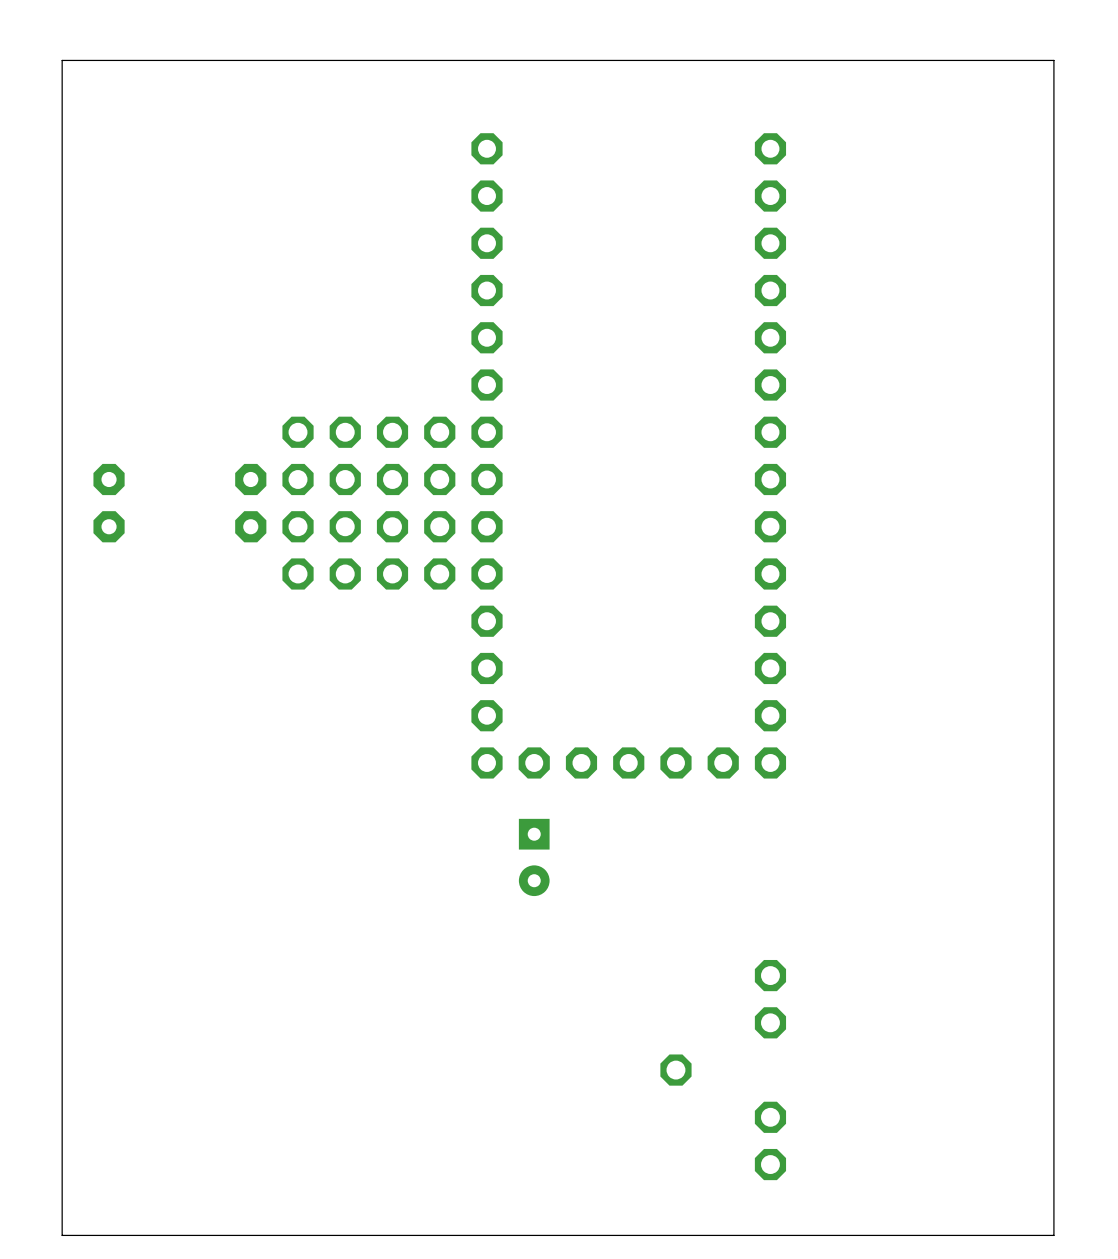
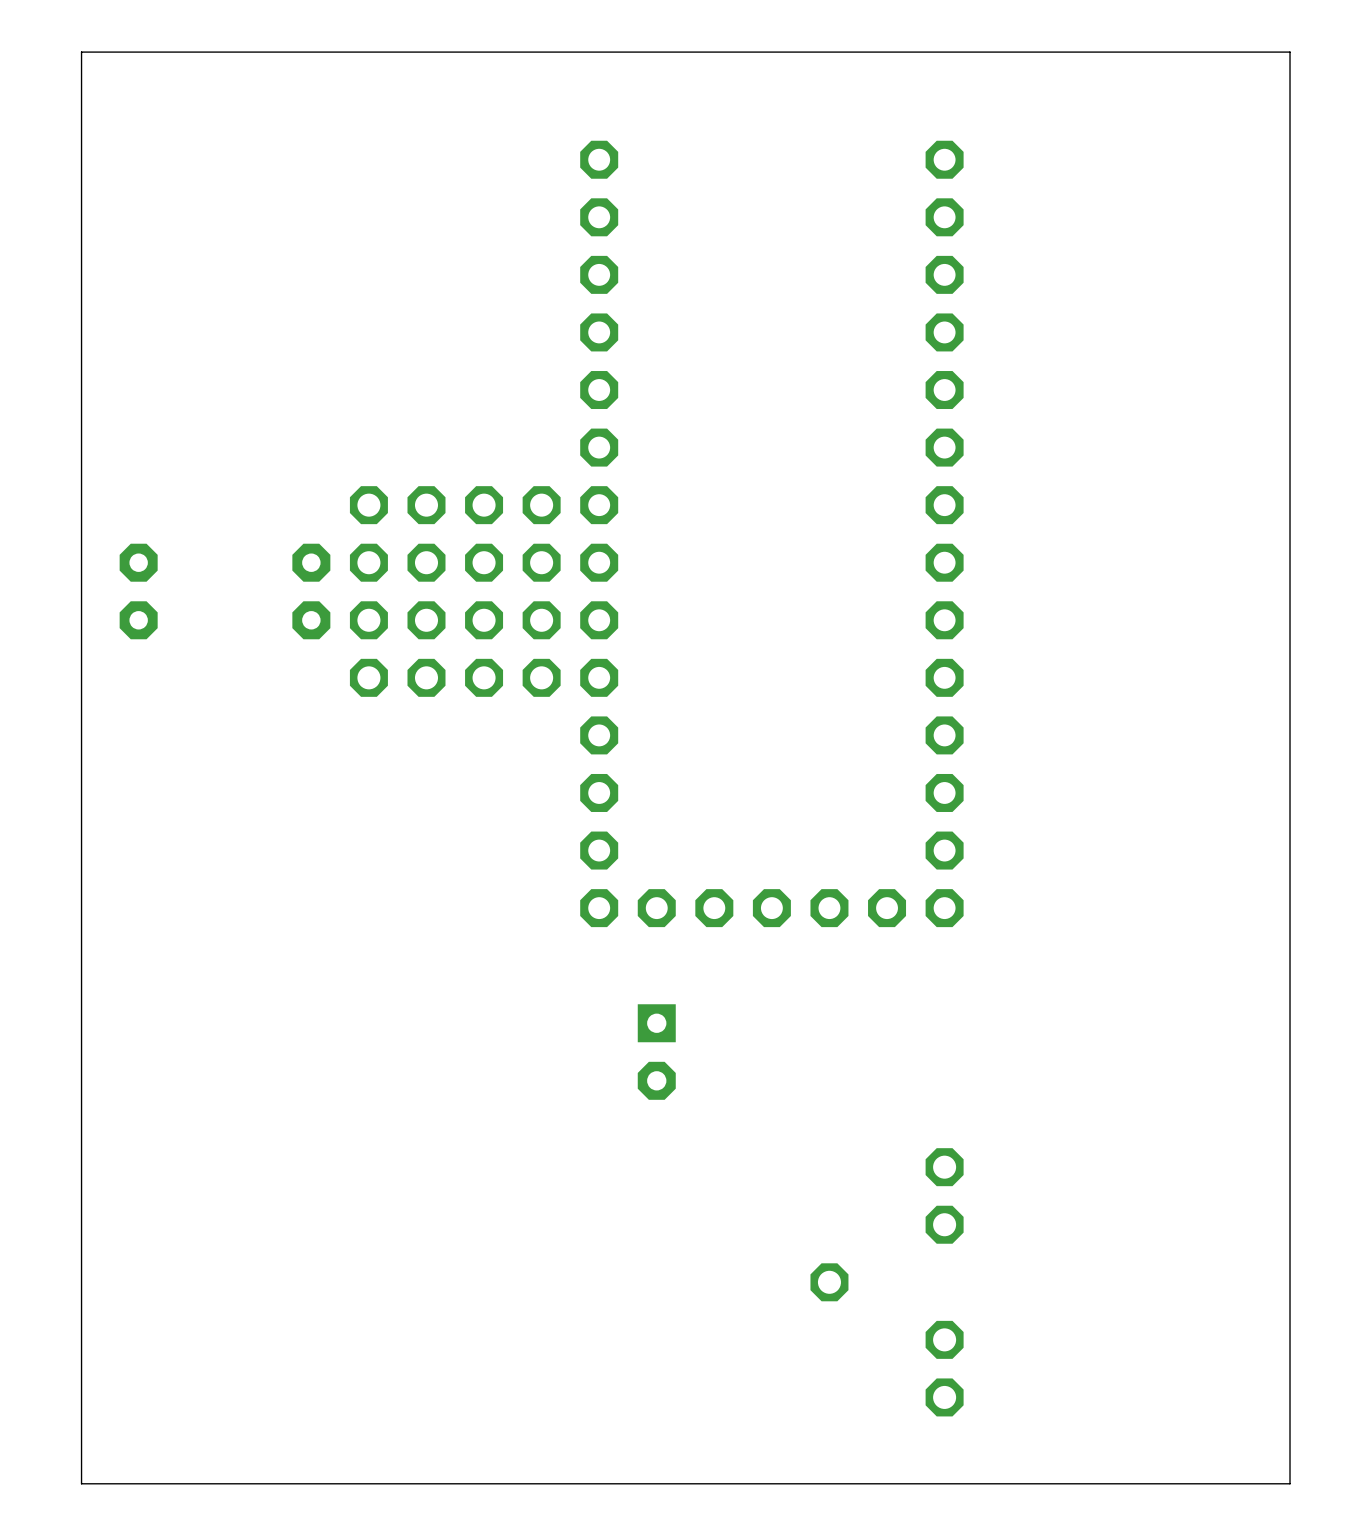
part: (534, 857) -> none
part: none -> (656, 1052)

